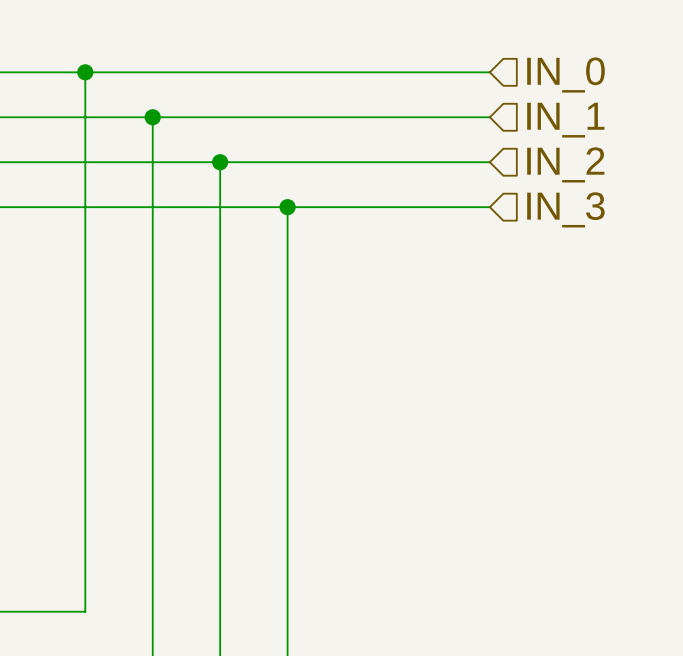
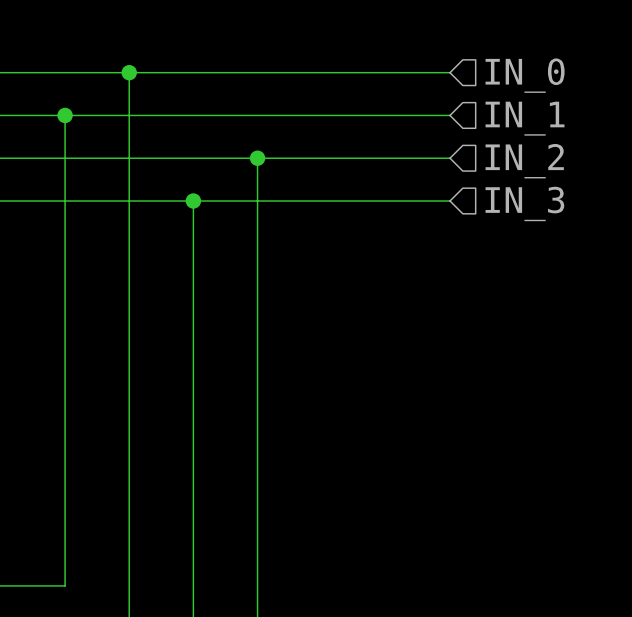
wire: (85, 72) (85, 117) -> (129, 72) (129, 115)
junction: (85, 72) -> none
junction: none -> (129, 72)
junction: none -> (65, 115)
junction: (152, 117) -> none
wire: (220, 162) (220, 207) -> (257, 158) (257, 201)
junction: (220, 162) -> none
junction: none -> (257, 158)
junction: none -> (193, 201)
junction: (287, 207) -> none

